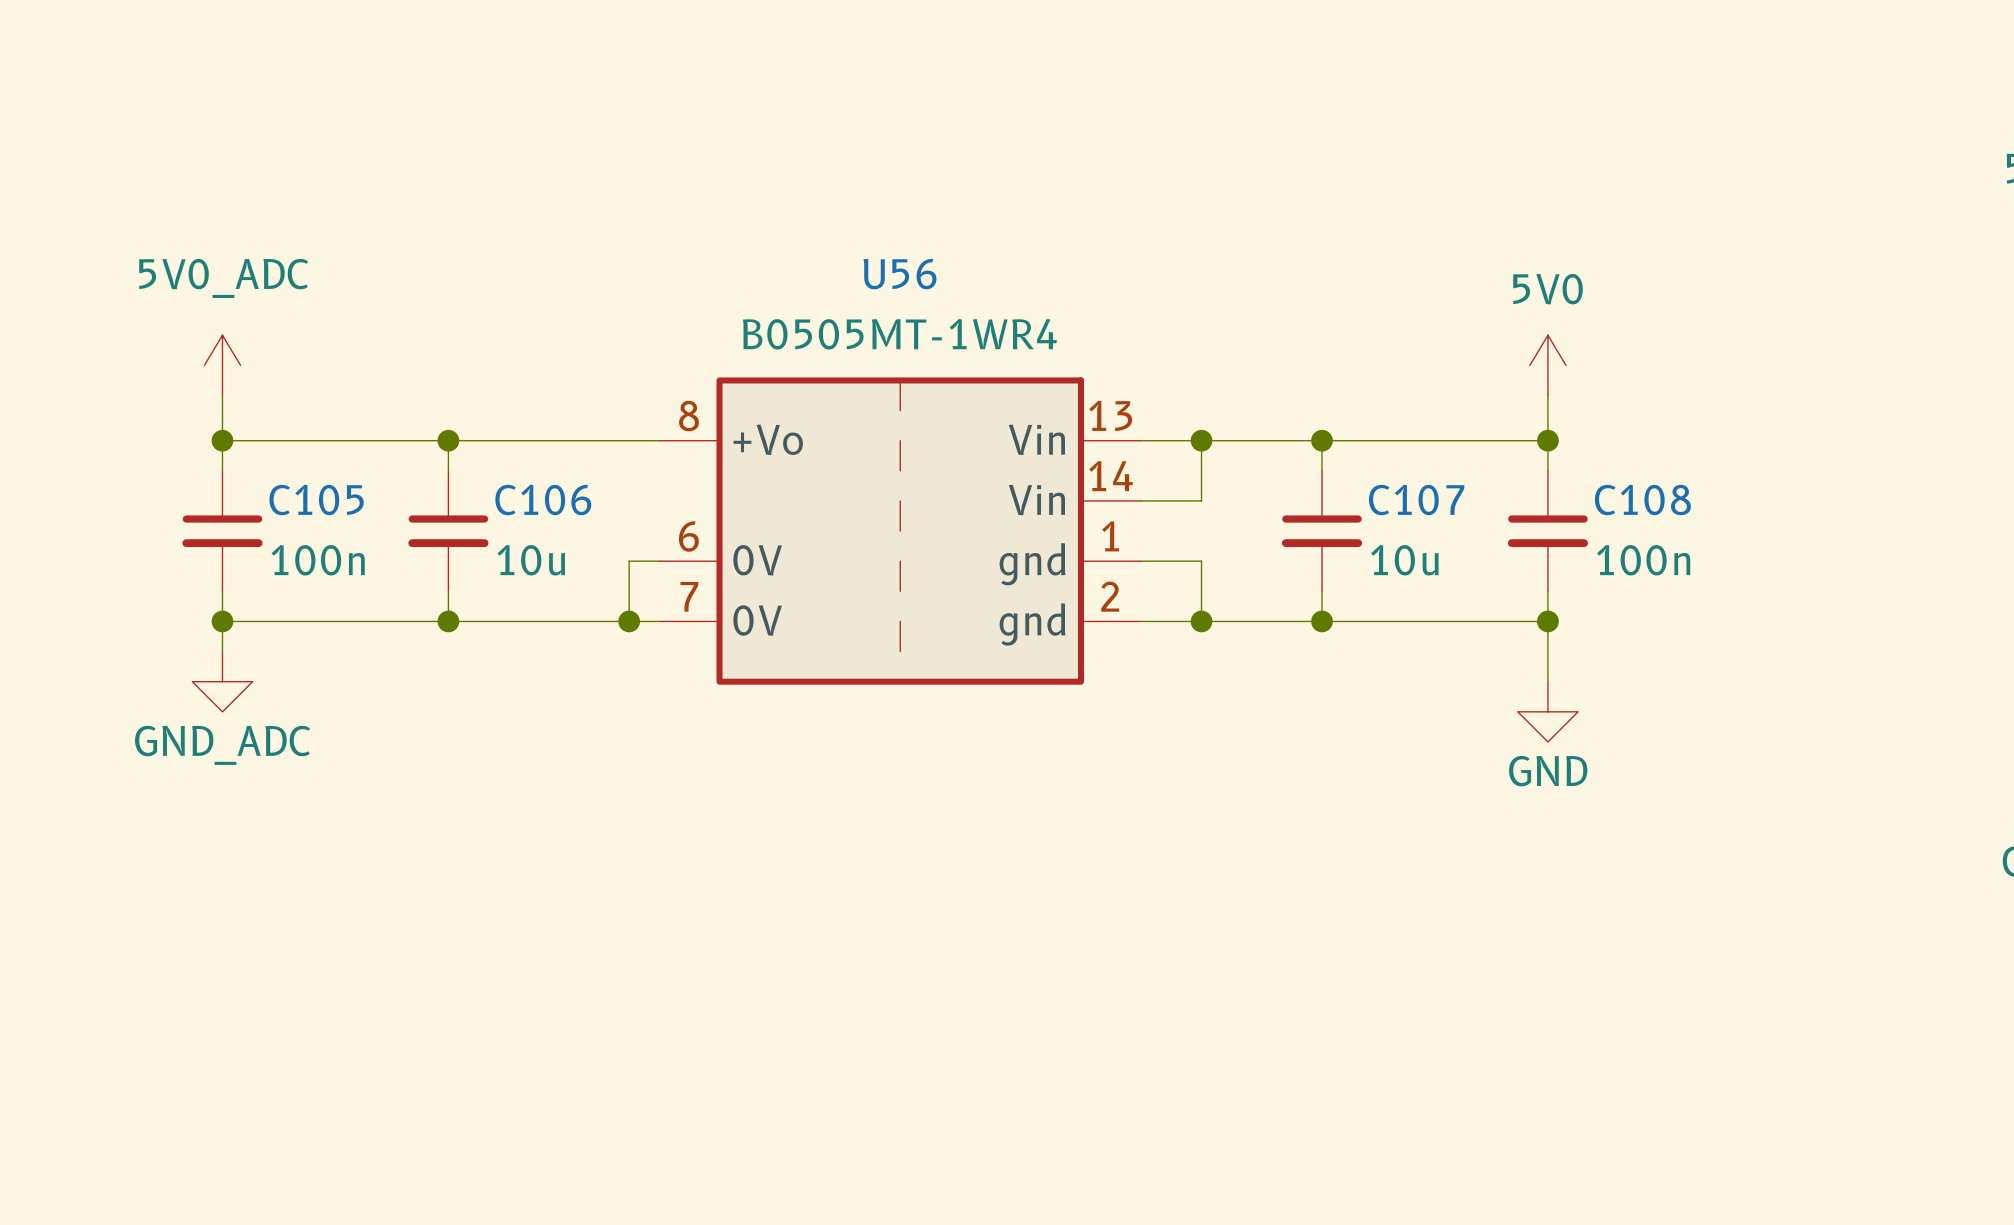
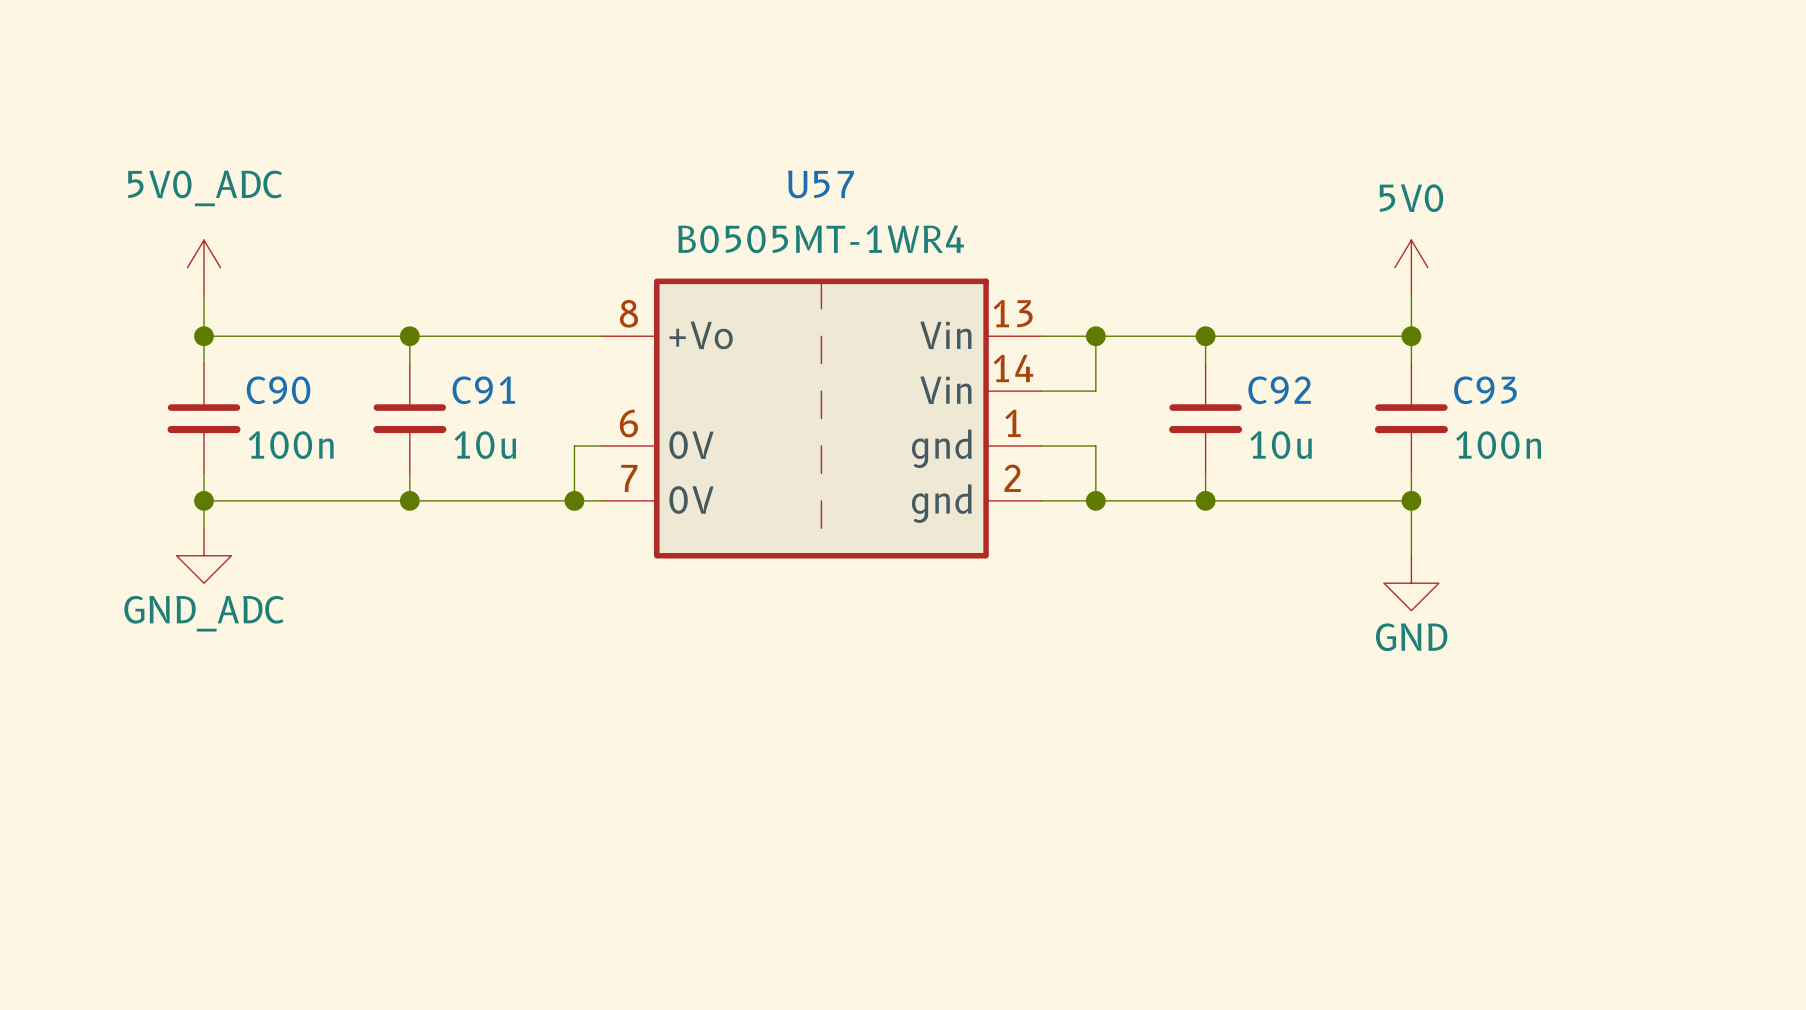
U56 name: U56 (900, 274) -> U57 (820, 184)
C105 name: C105 (316, 500) -> C90 (278, 390)
C106 name: C106 (543, 500) -> C91 (483, 390)
C107 name: C107 (1416, 500) -> C92 (1279, 390)
C108 name: C108 (1642, 500) -> C93 (1485, 390)

